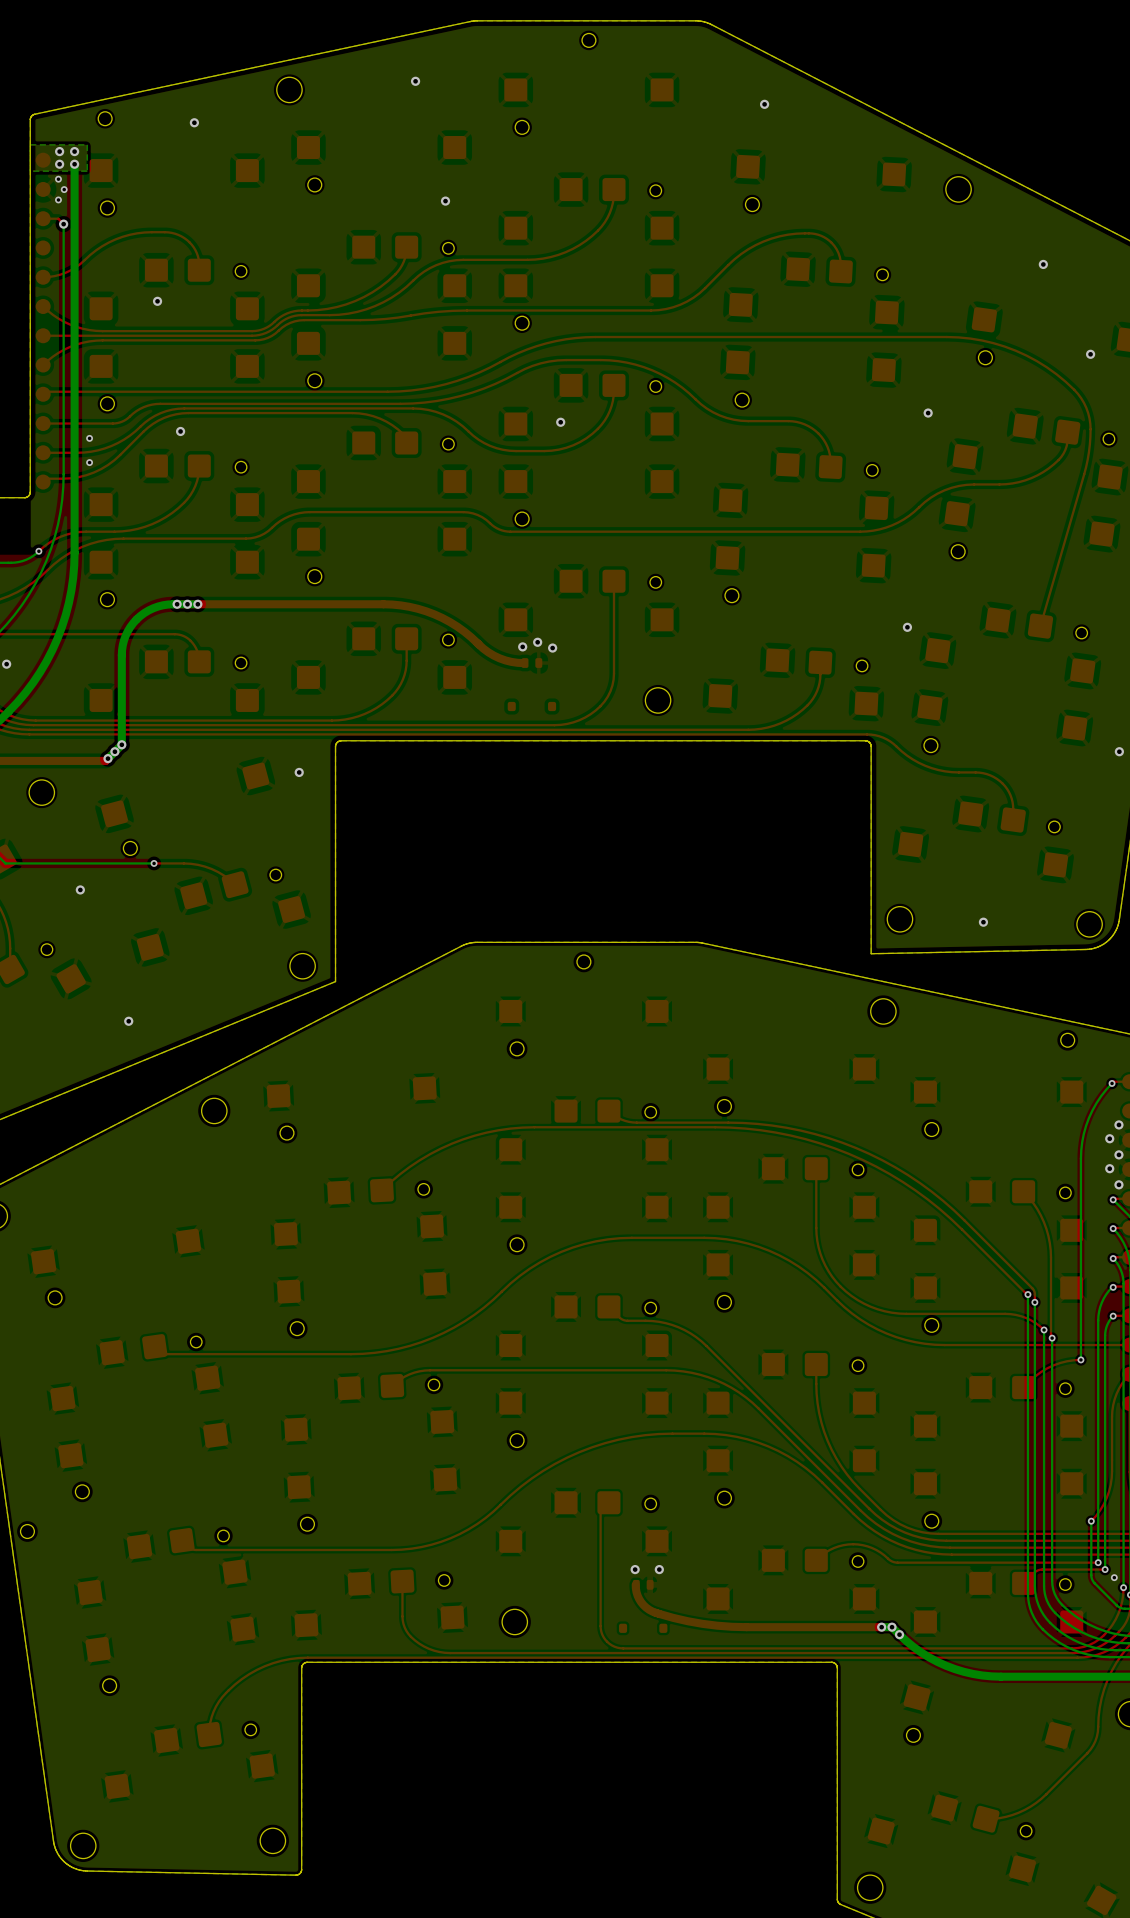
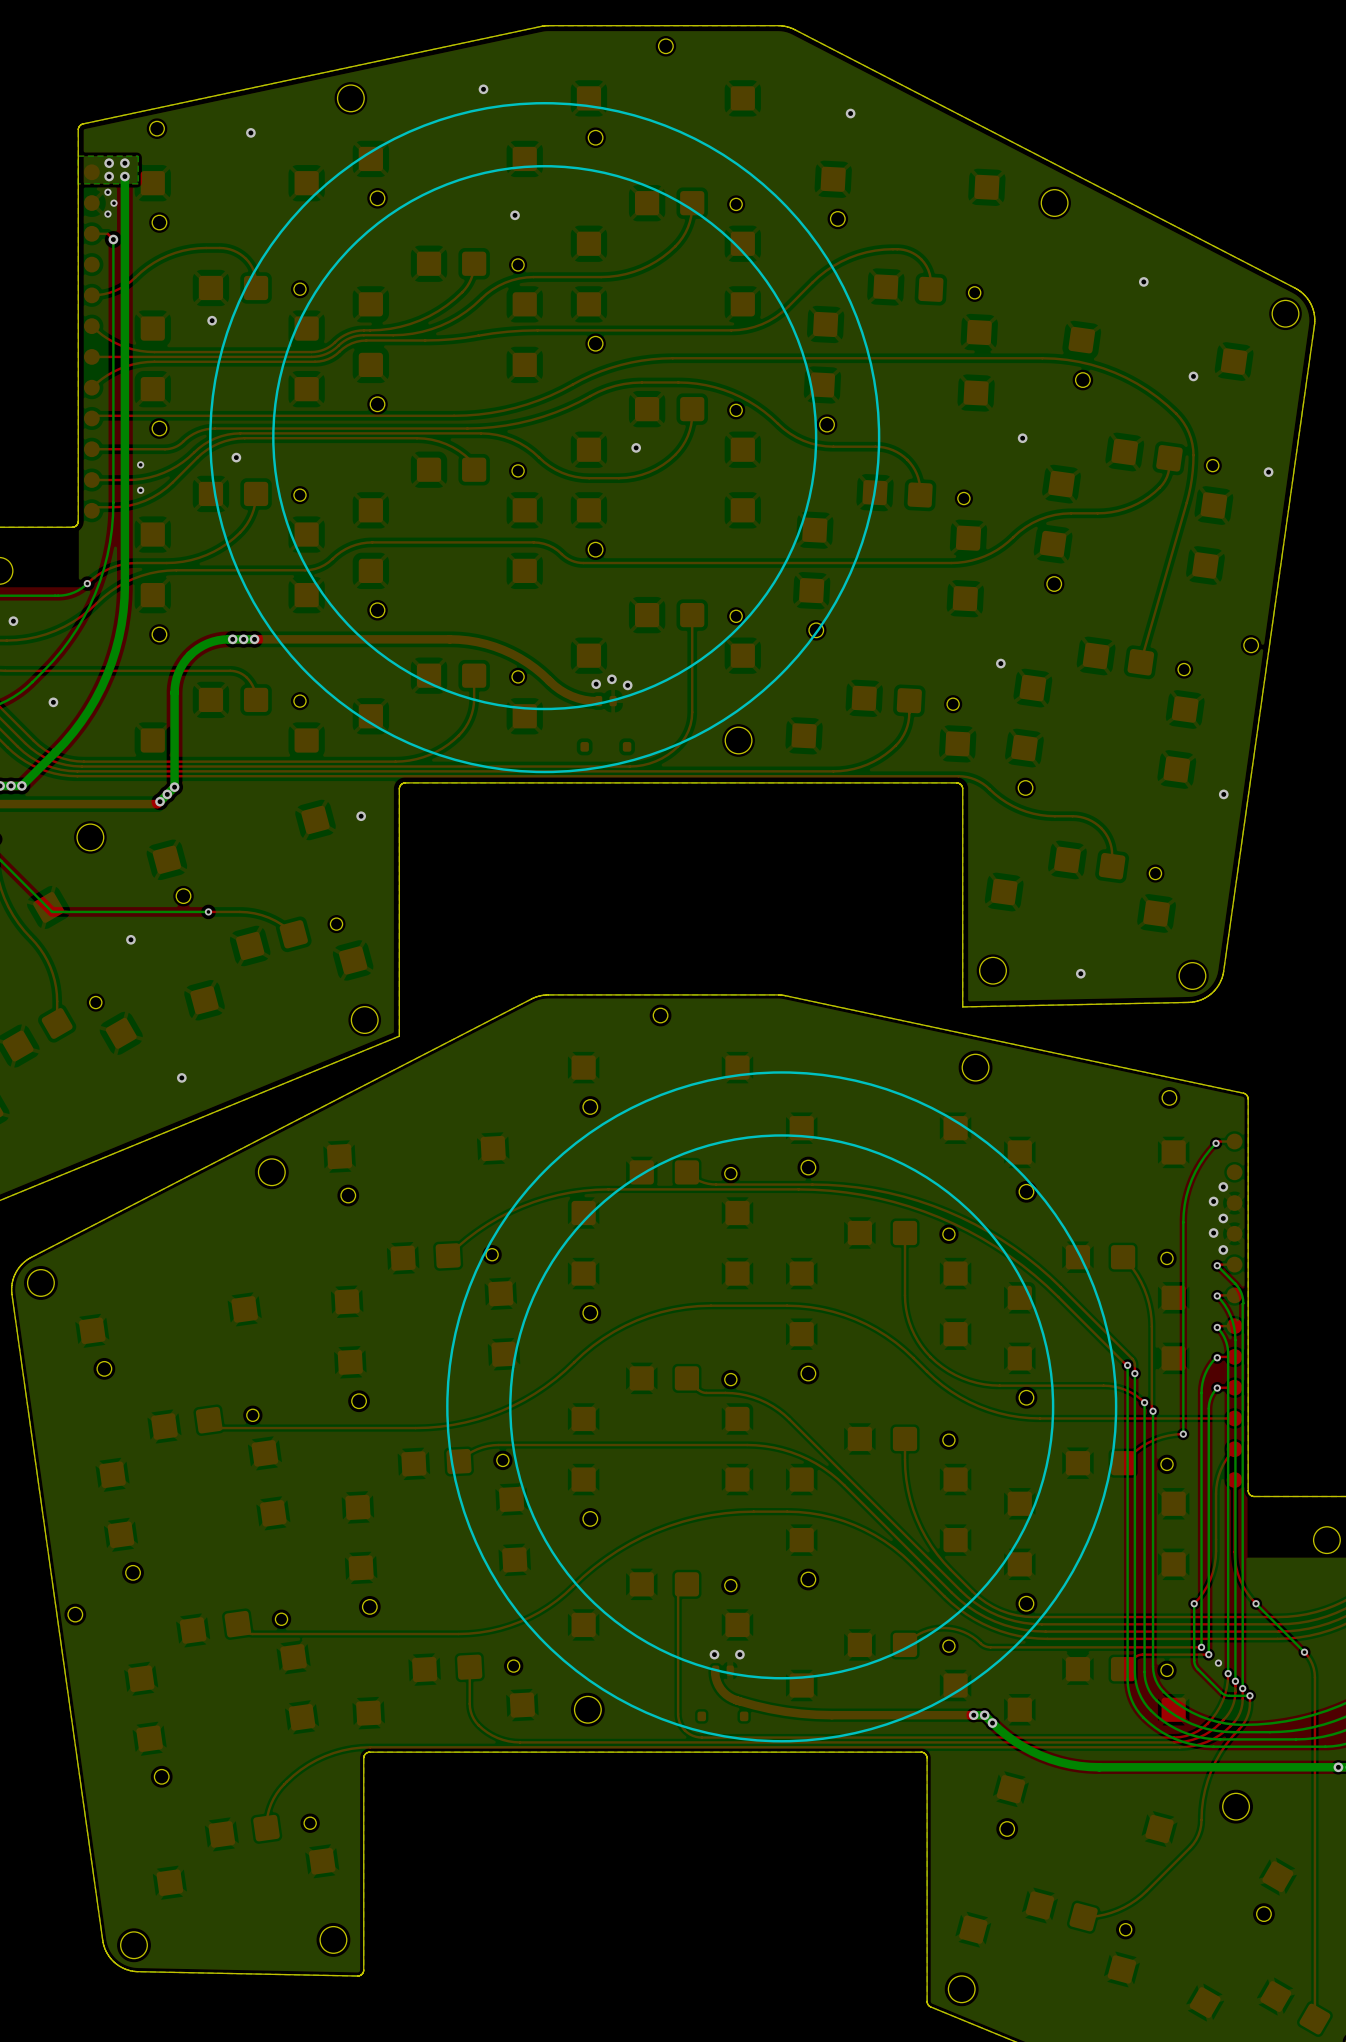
drawing: none -> [209, 102, 881, 774]
drawing: none -> [446, 1071, 1118, 1743]

